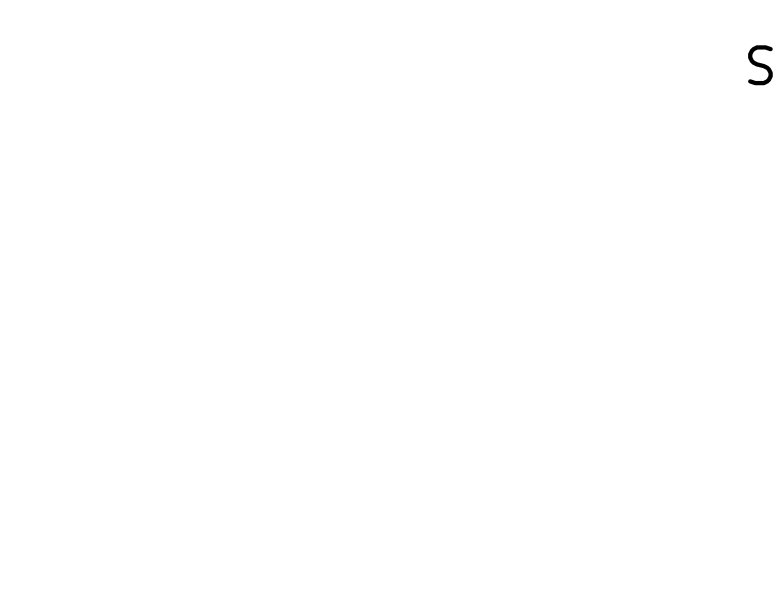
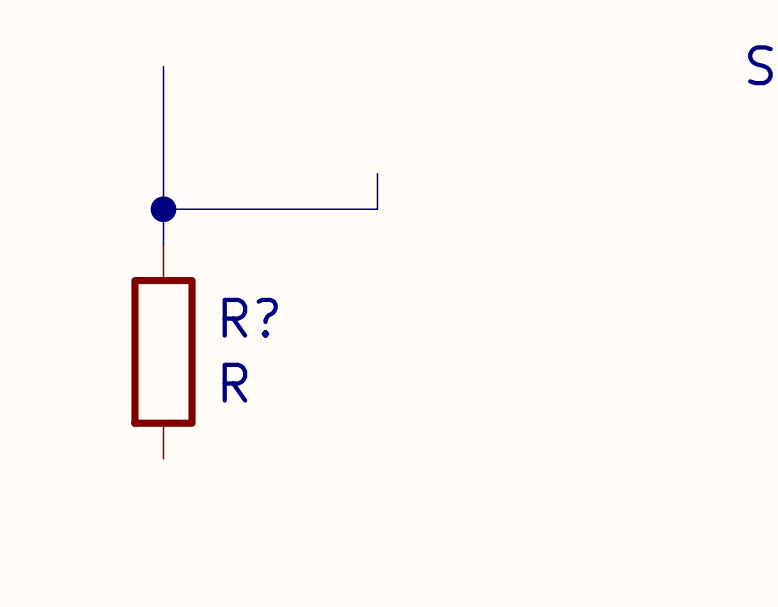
wire: none -> (163, 66) (163, 244)
wire: none -> (377, 173) (377, 209) (163, 209)
junction: none -> (163, 209)
R?: none -> R (163, 351)

